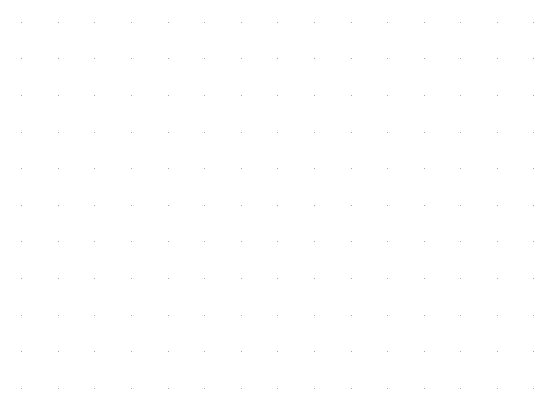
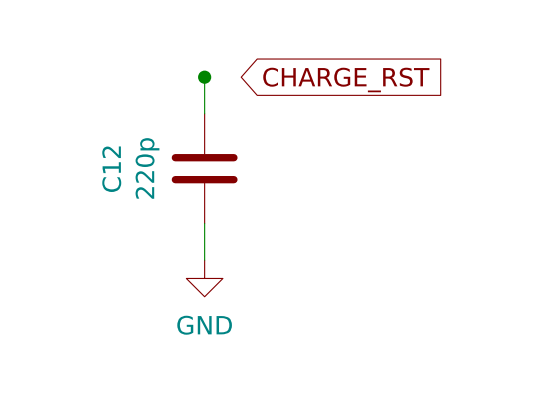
wire: none -> (204, 77) (204, 113)
junction: none -> (204, 77)
global label: none -> CHARGE_RST (346, 79)
C12: none -> 220p (204, 168)
wire: none -> (204, 223) (204, 260)
power symbol: none -> GND (204, 278)

